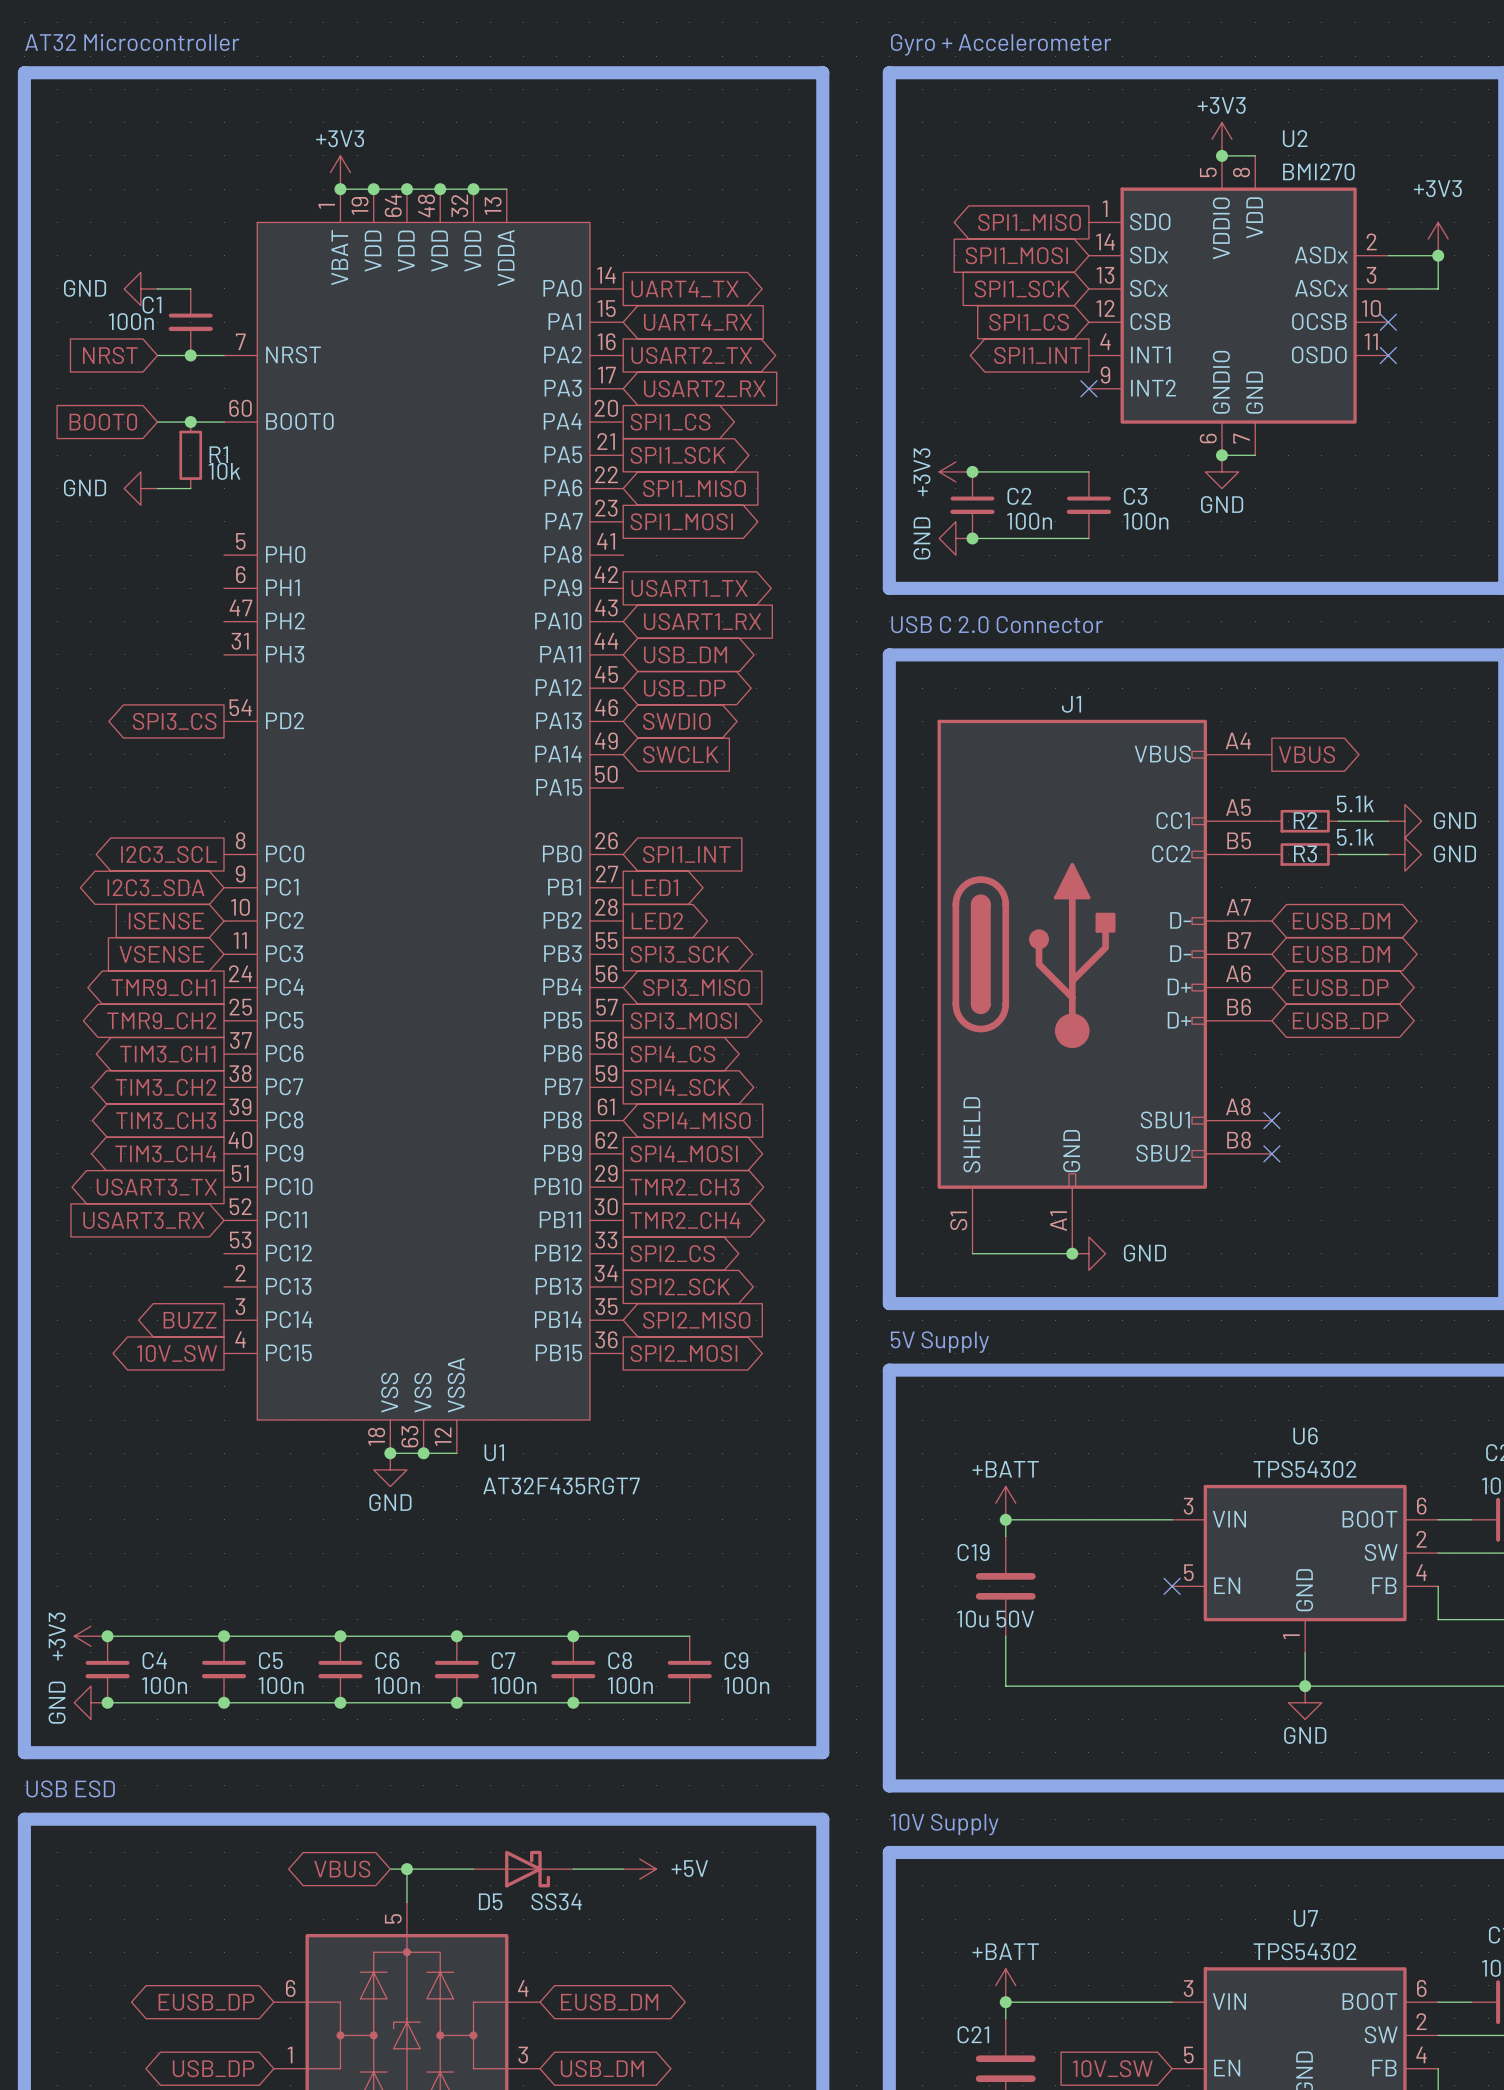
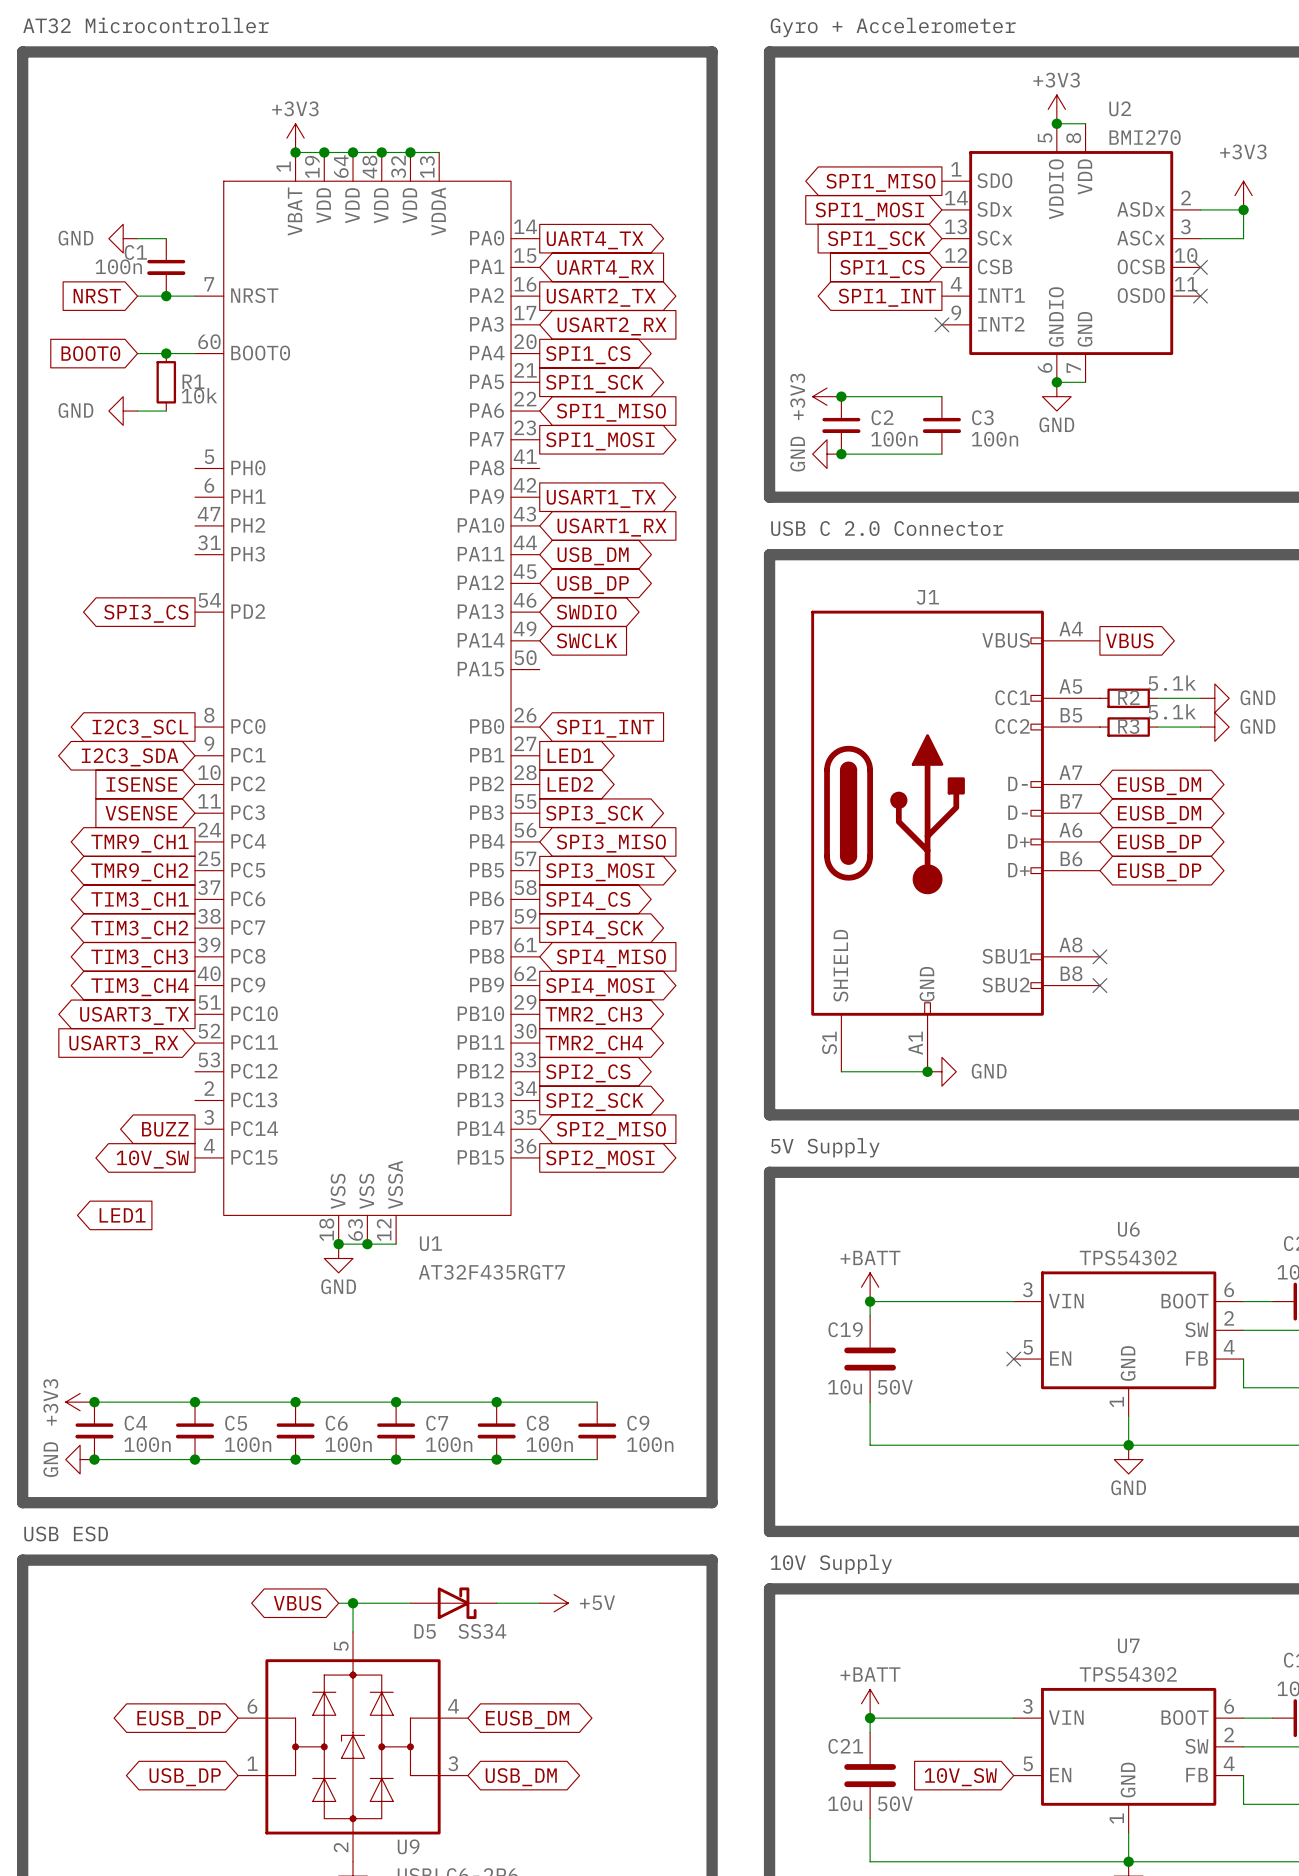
global label: none -> LED1 (122, 1215)

